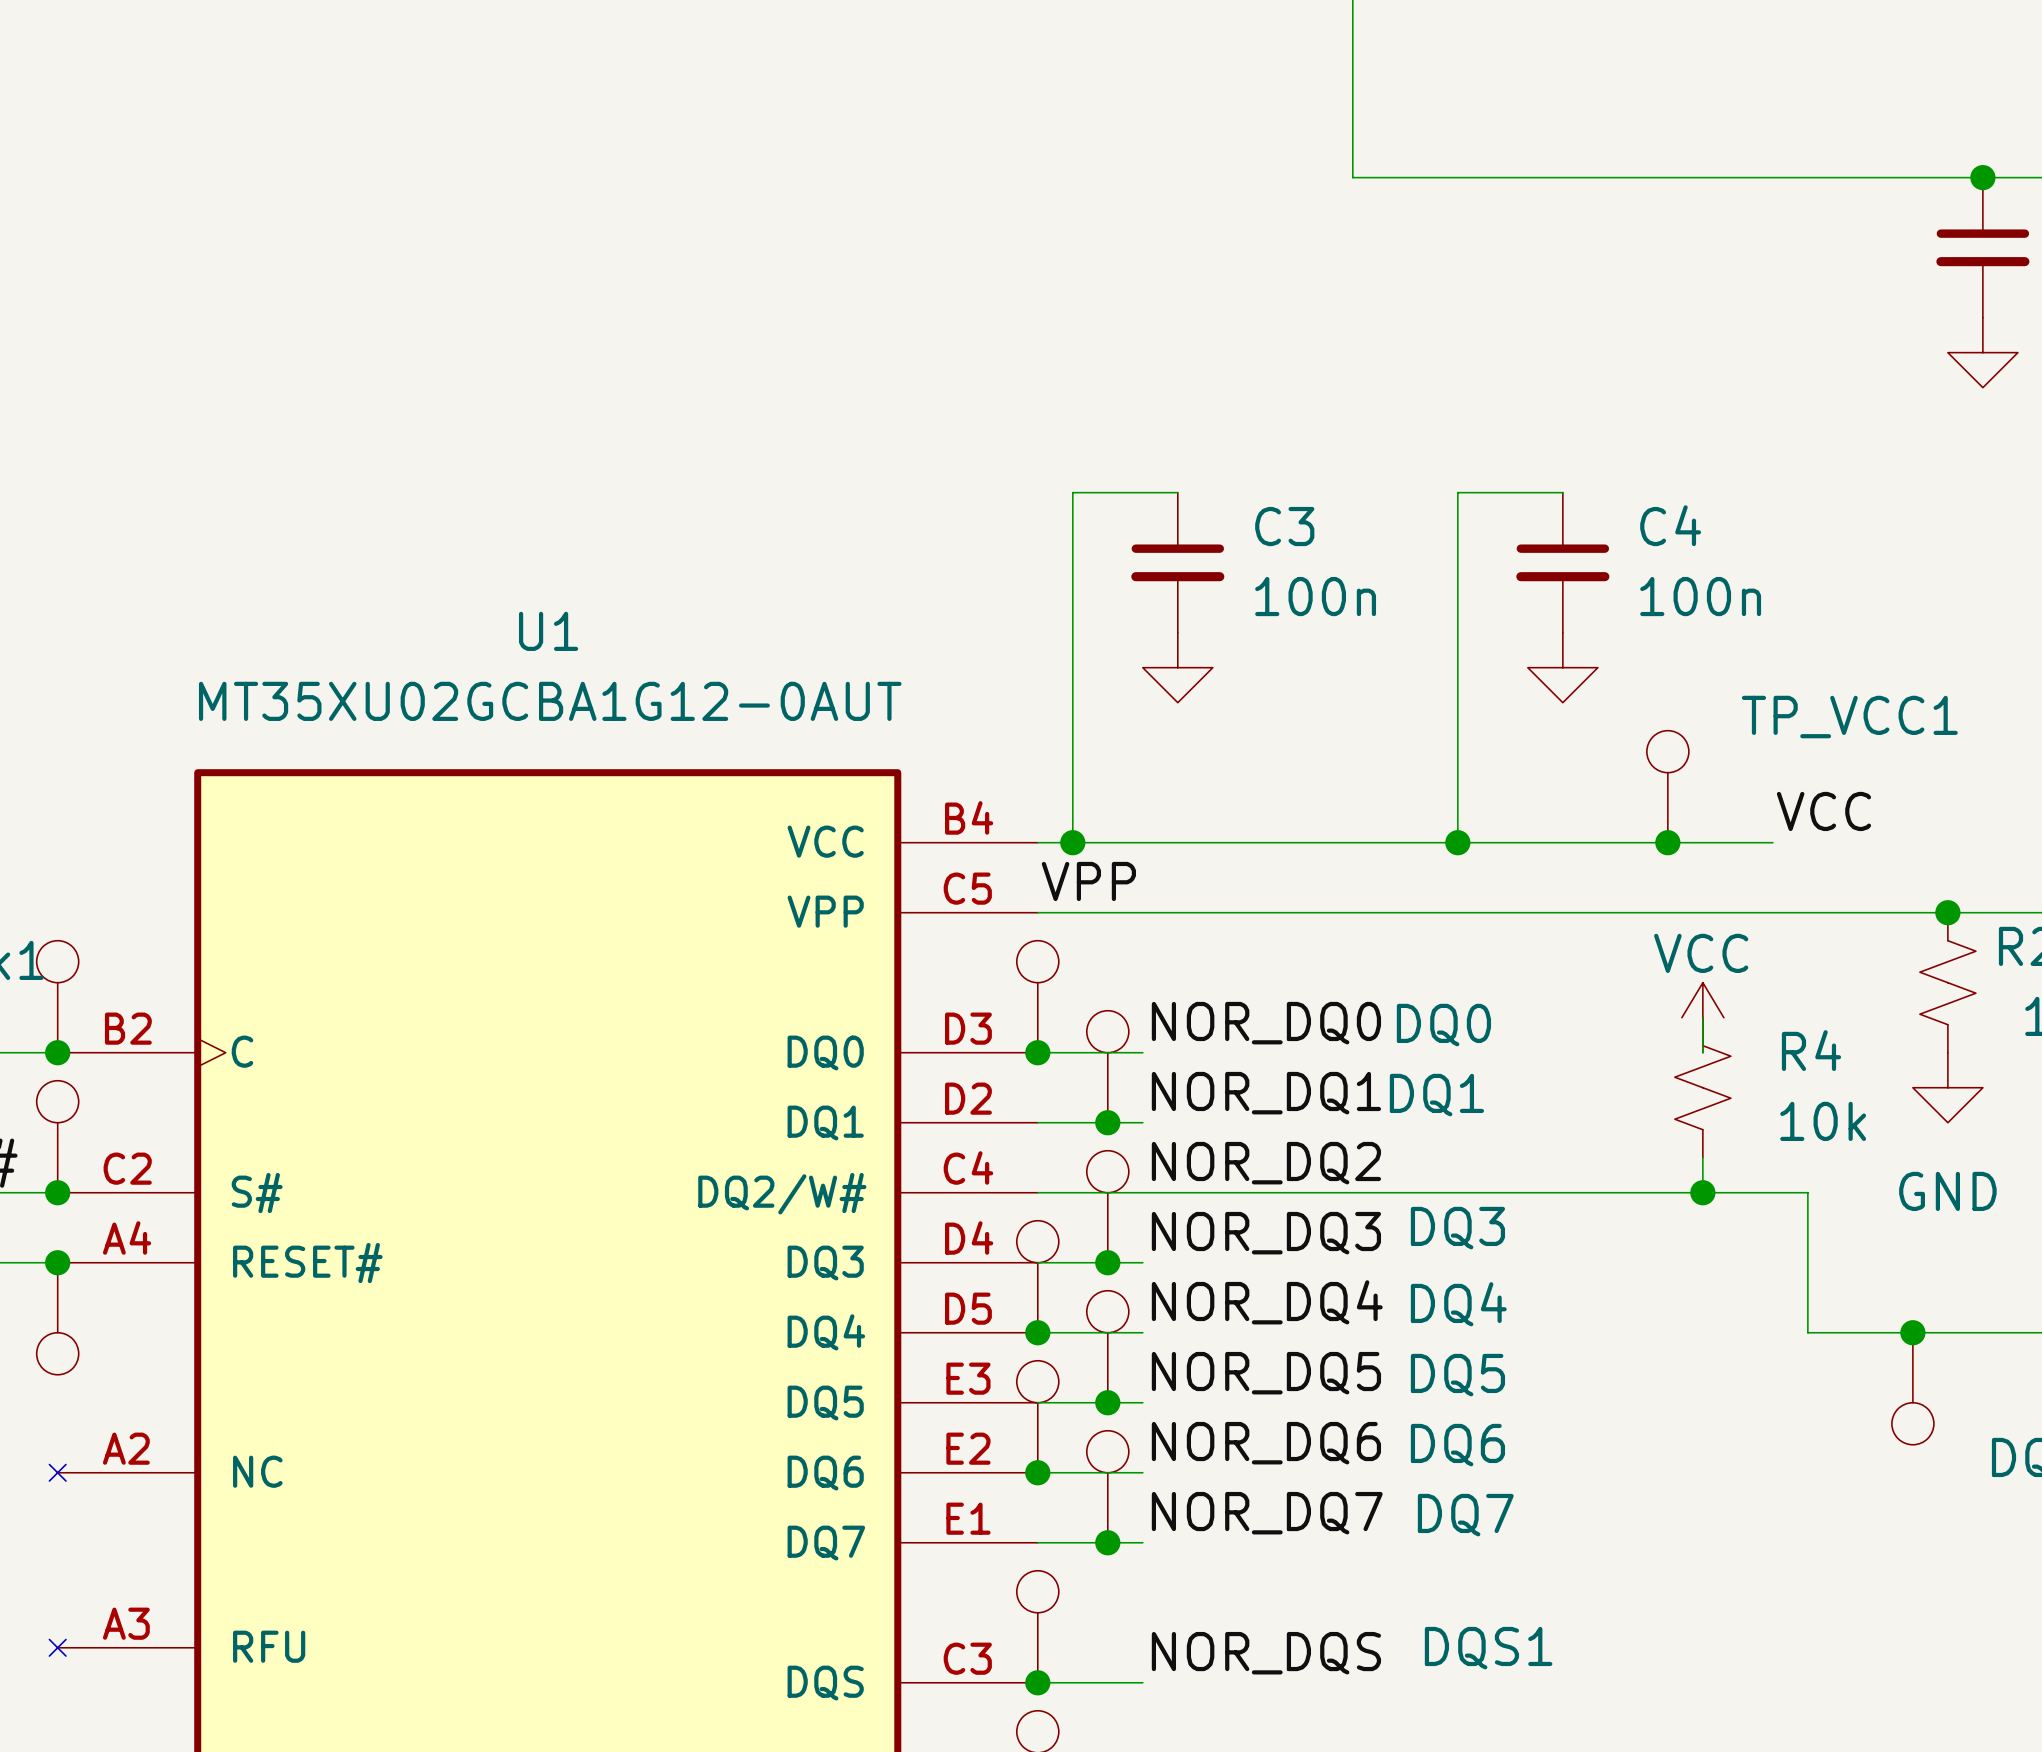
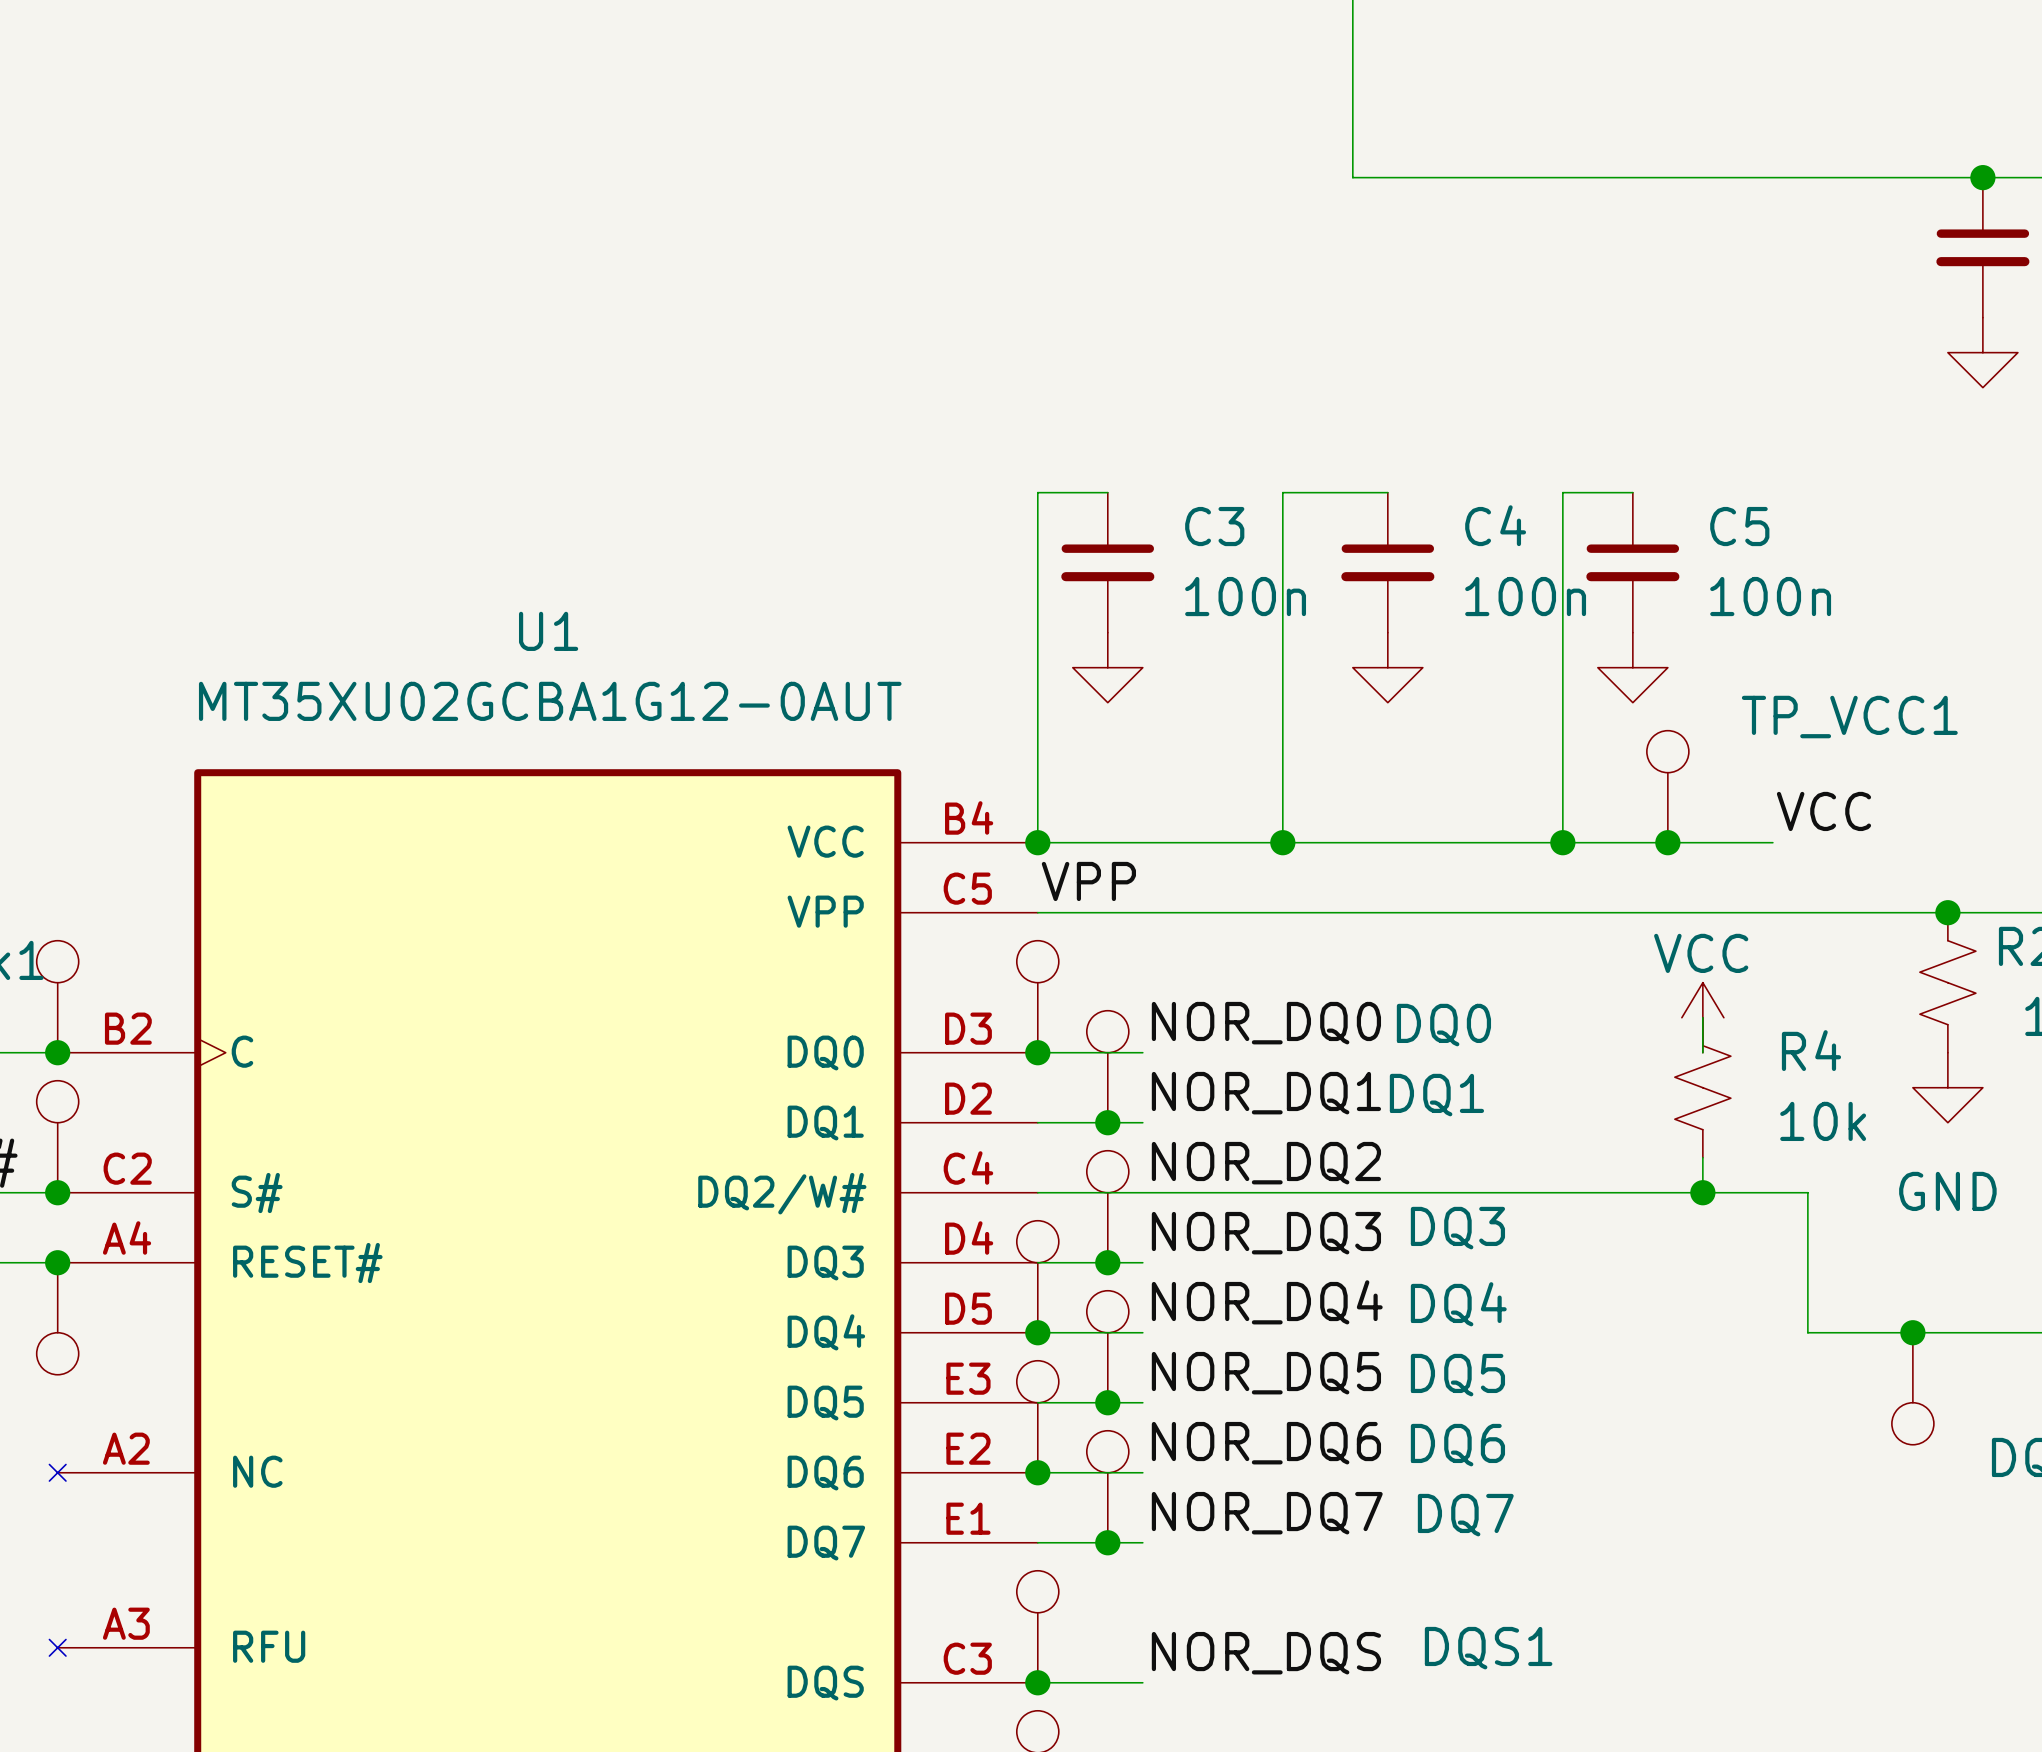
wire: (1072, 492) (1072, 842) -> (1072, 492) (1037, 492) (1037, 842)
wire: (1107, 492) (1177, 492) -> none
wire: (1562, 492) (1457, 492) (1457, 842) -> (1387, 492) (1282, 492) (1282, 842)
wire: none -> (1632, 492) (1562, 492) (1562, 842)
C3 position: (1177, 562) -> (1107, 562)
C4 position: (1562, 562) -> (1387, 562)
C5: none -> 100n (1632, 562)
power symbol position: (1177, 667) -> (1107, 667)
power symbol: none -> (1387, 667)
power symbol position: (1562, 667) -> (1632, 667)
junction position: (1072, 842) -> (1037, 842)
junction: none -> (1282, 842)
junction: (1457, 842) -> none
junction: none -> (1562, 842)

